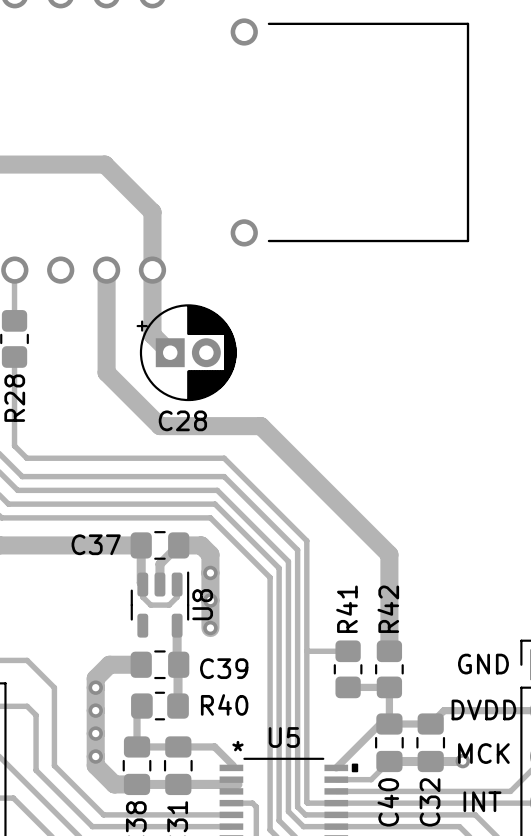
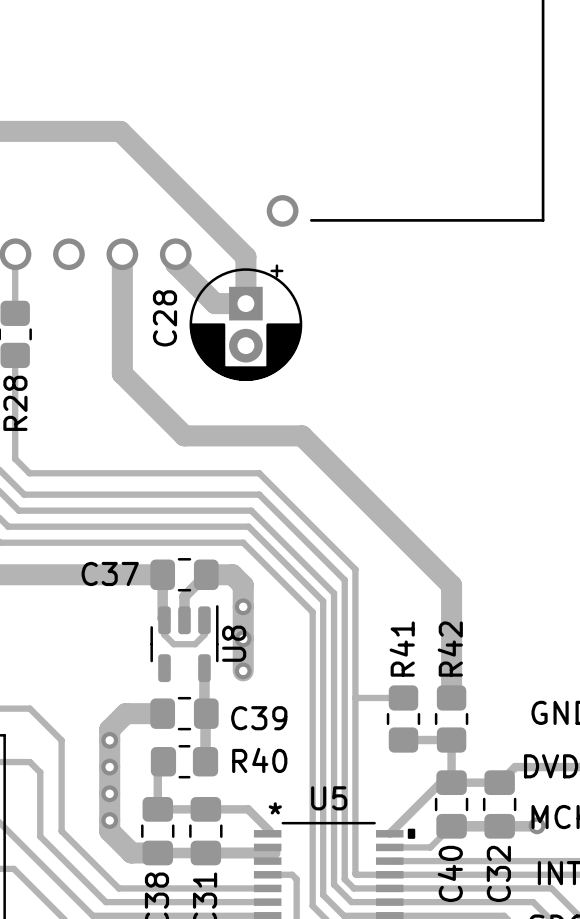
track: (152, 212) (152, 270) -> (175, 186) (245, 256) (245, 303) (215, 303) (175, 264)
track: (152, 278) (152, 334) (170, 352) -> none
C28 rotation: 0° (186, 352) -> 90° clockwise (245, 322)

